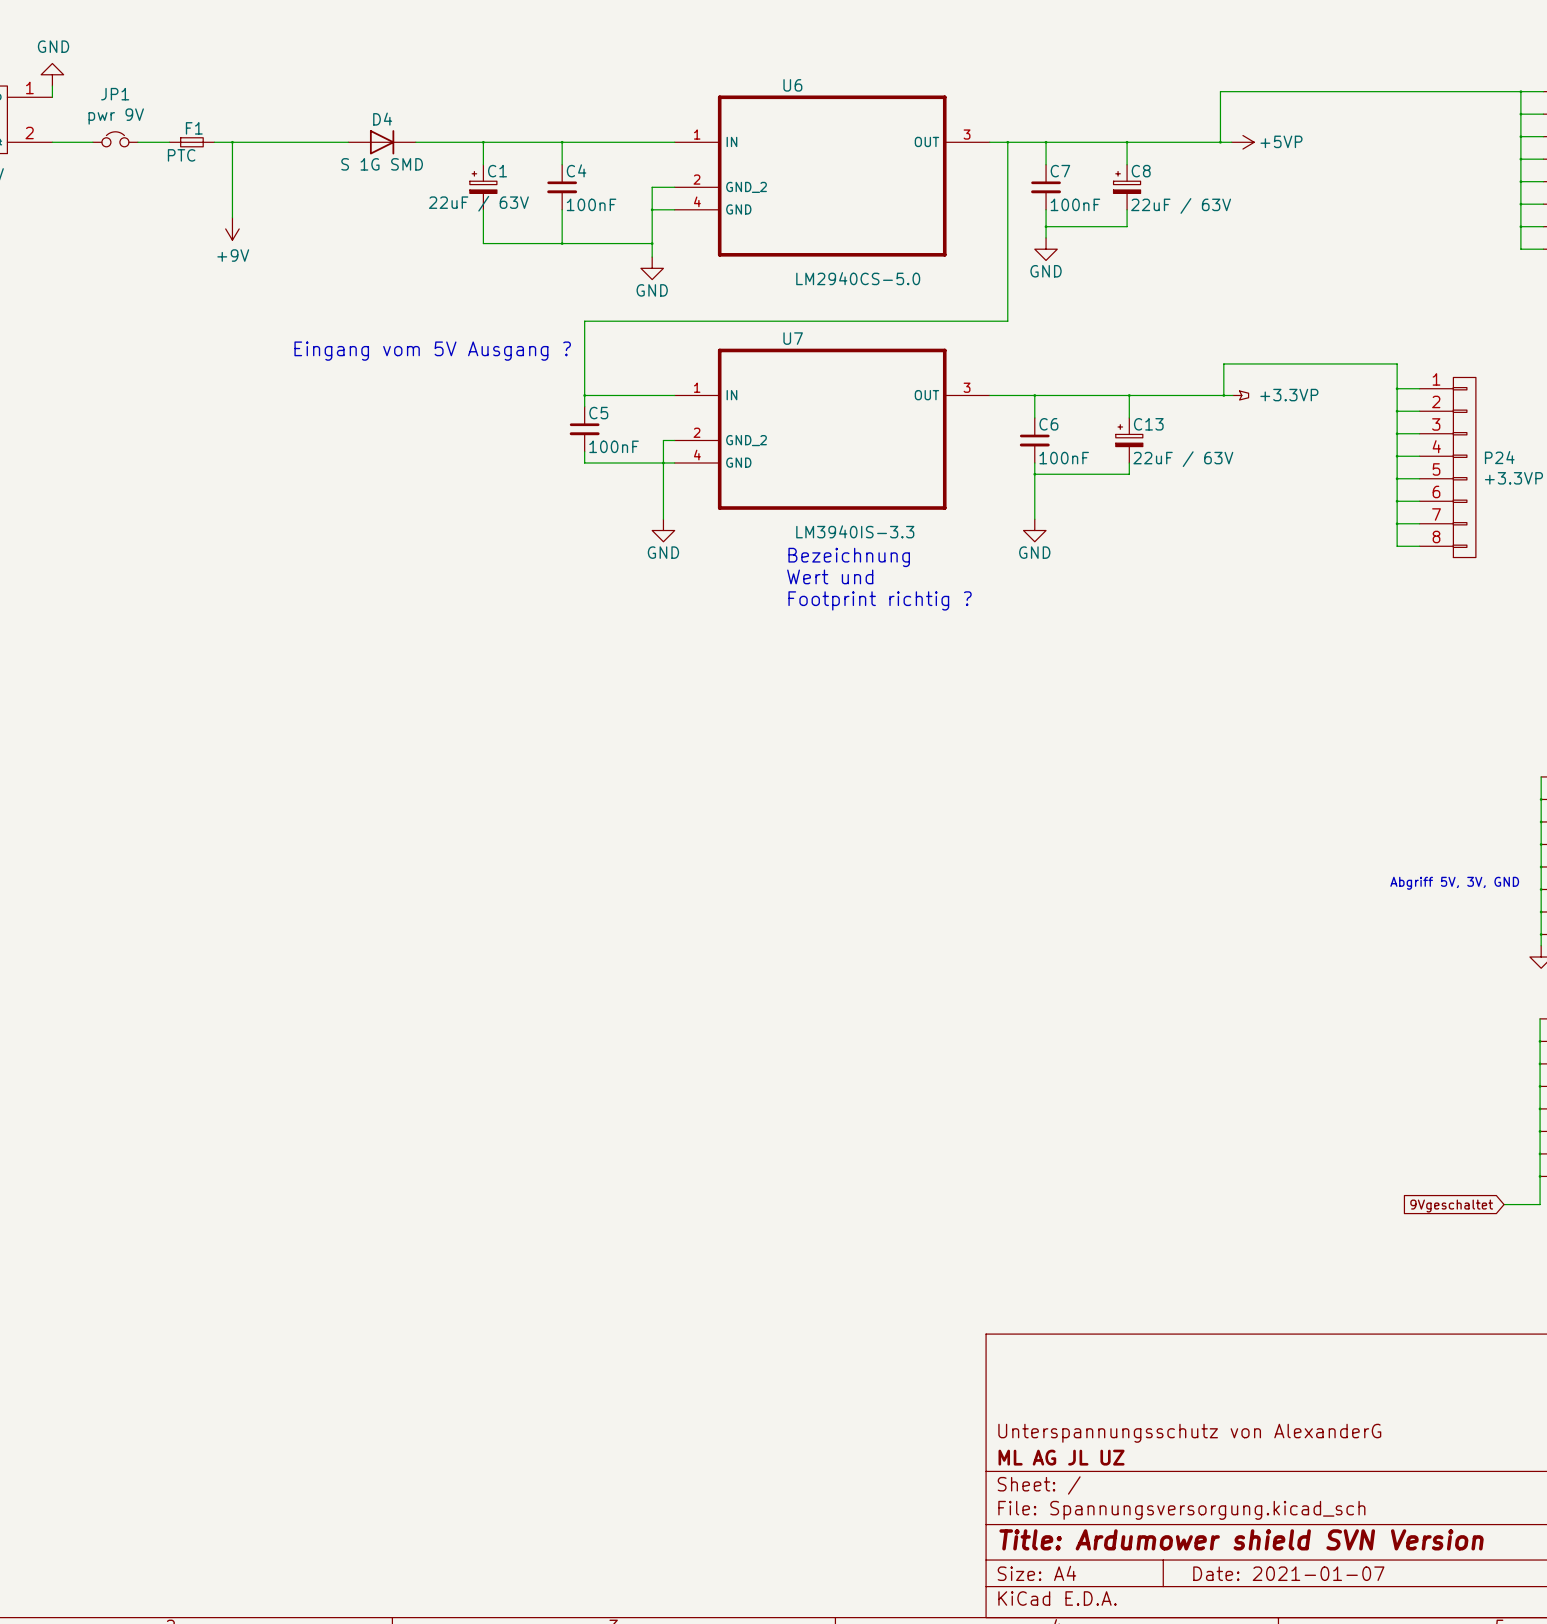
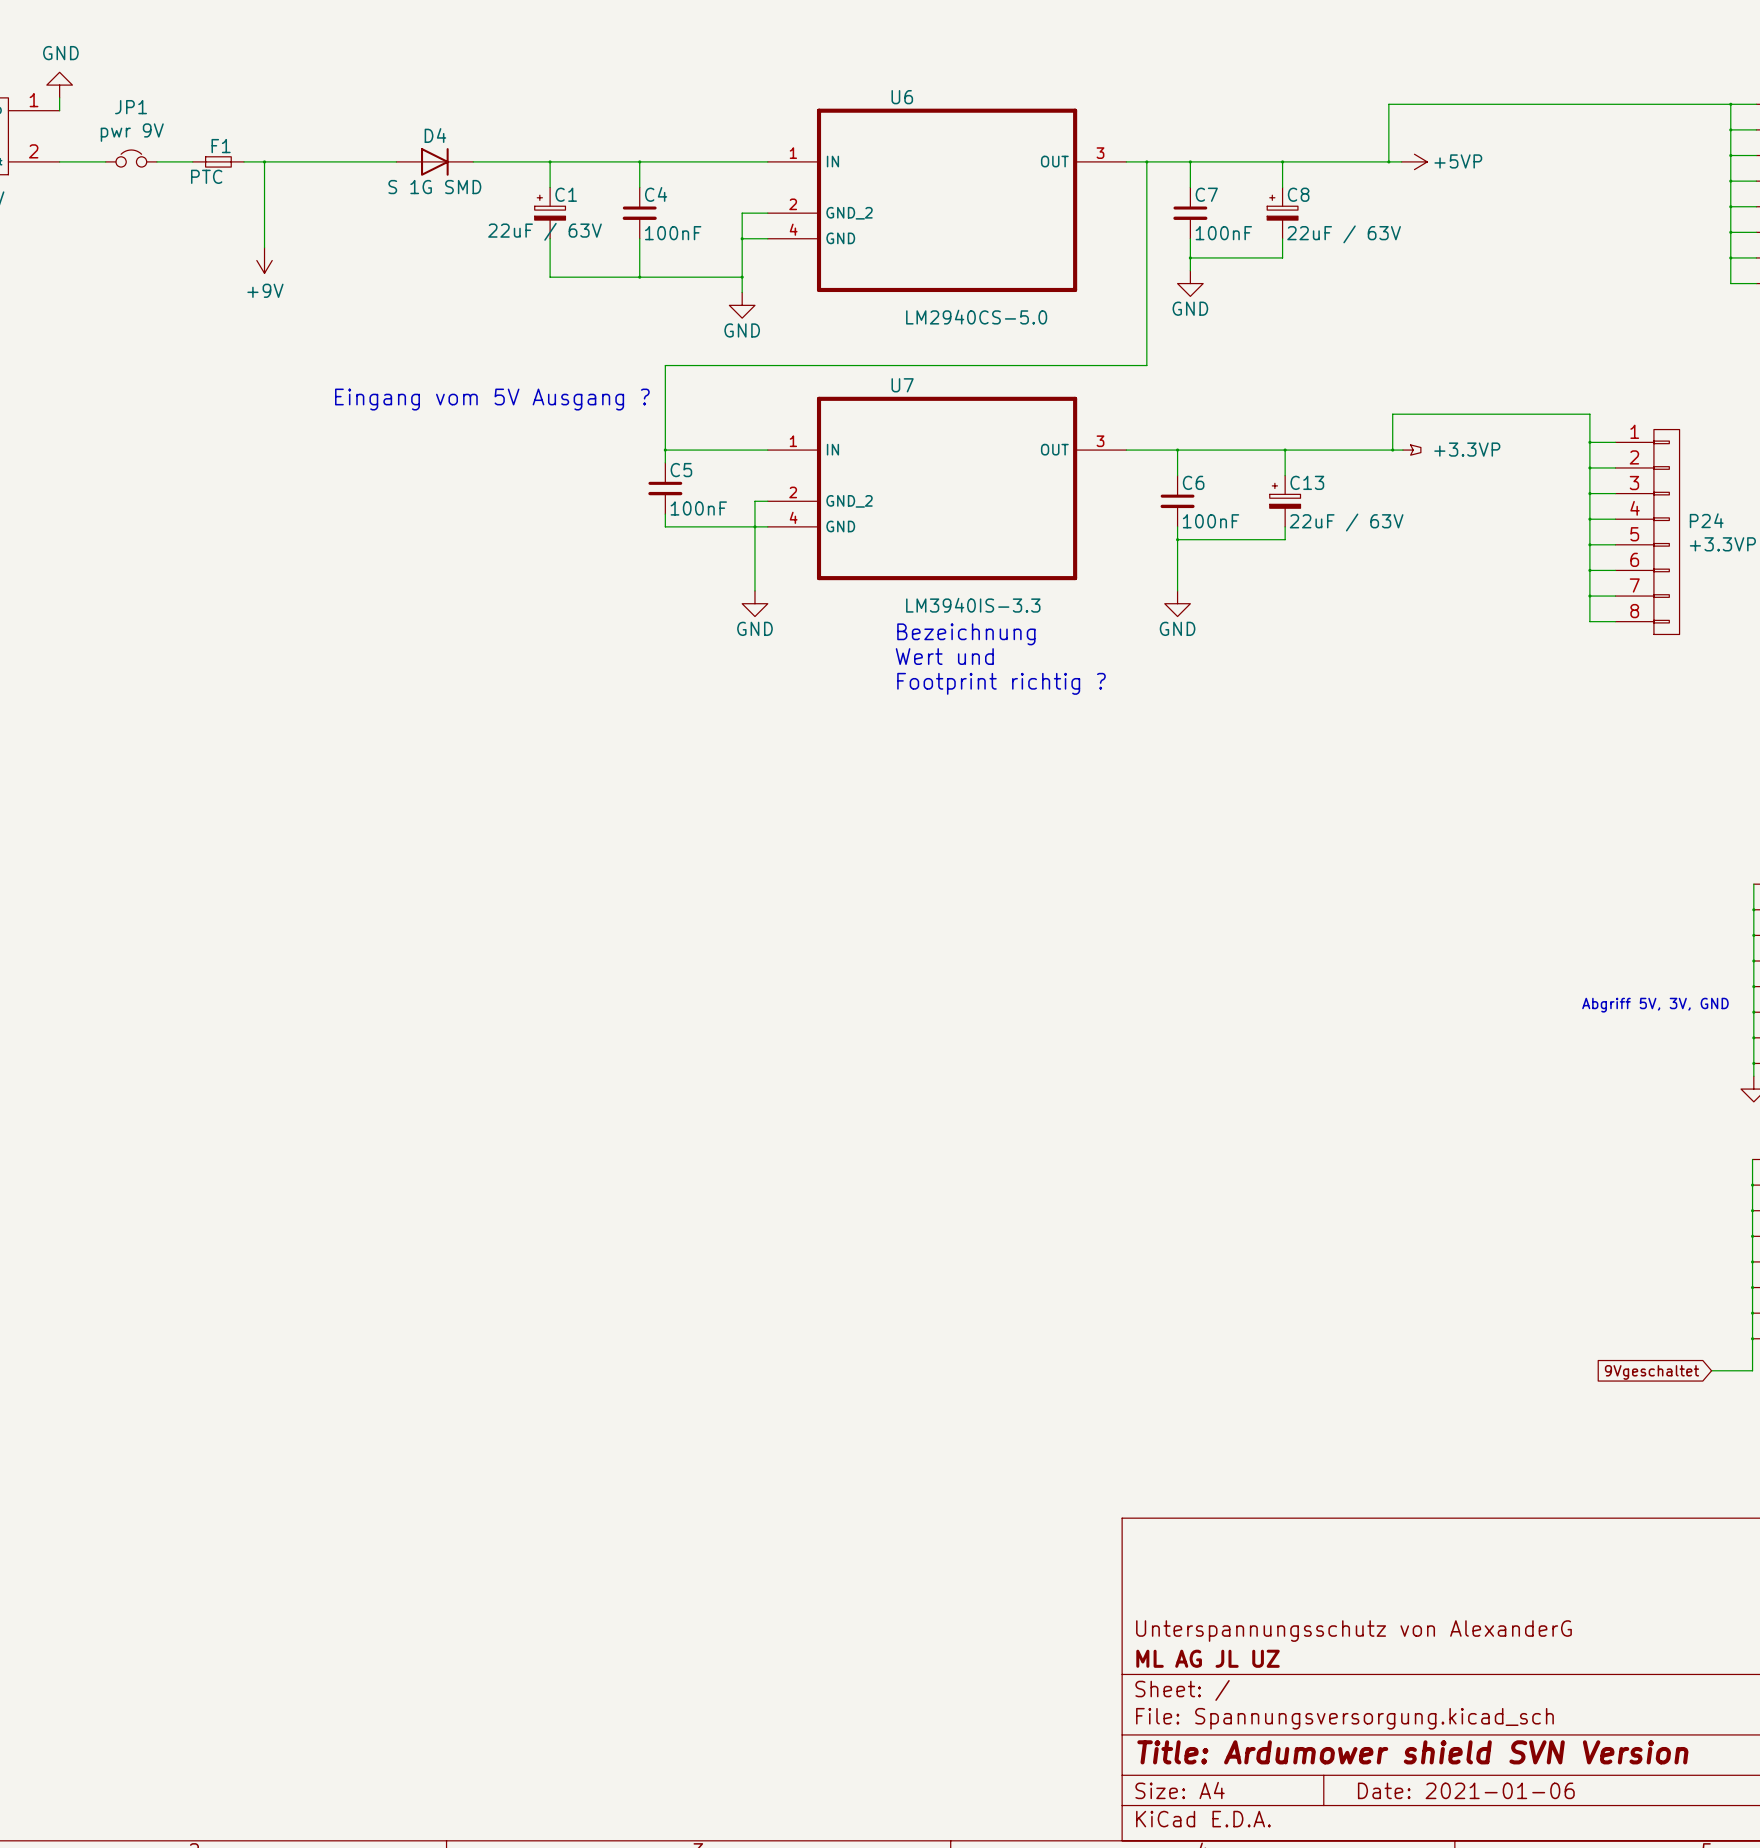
title block: Date: 2021-01-07 (1288, 1573) -> Date: 2021-01-06 (1466, 1790)

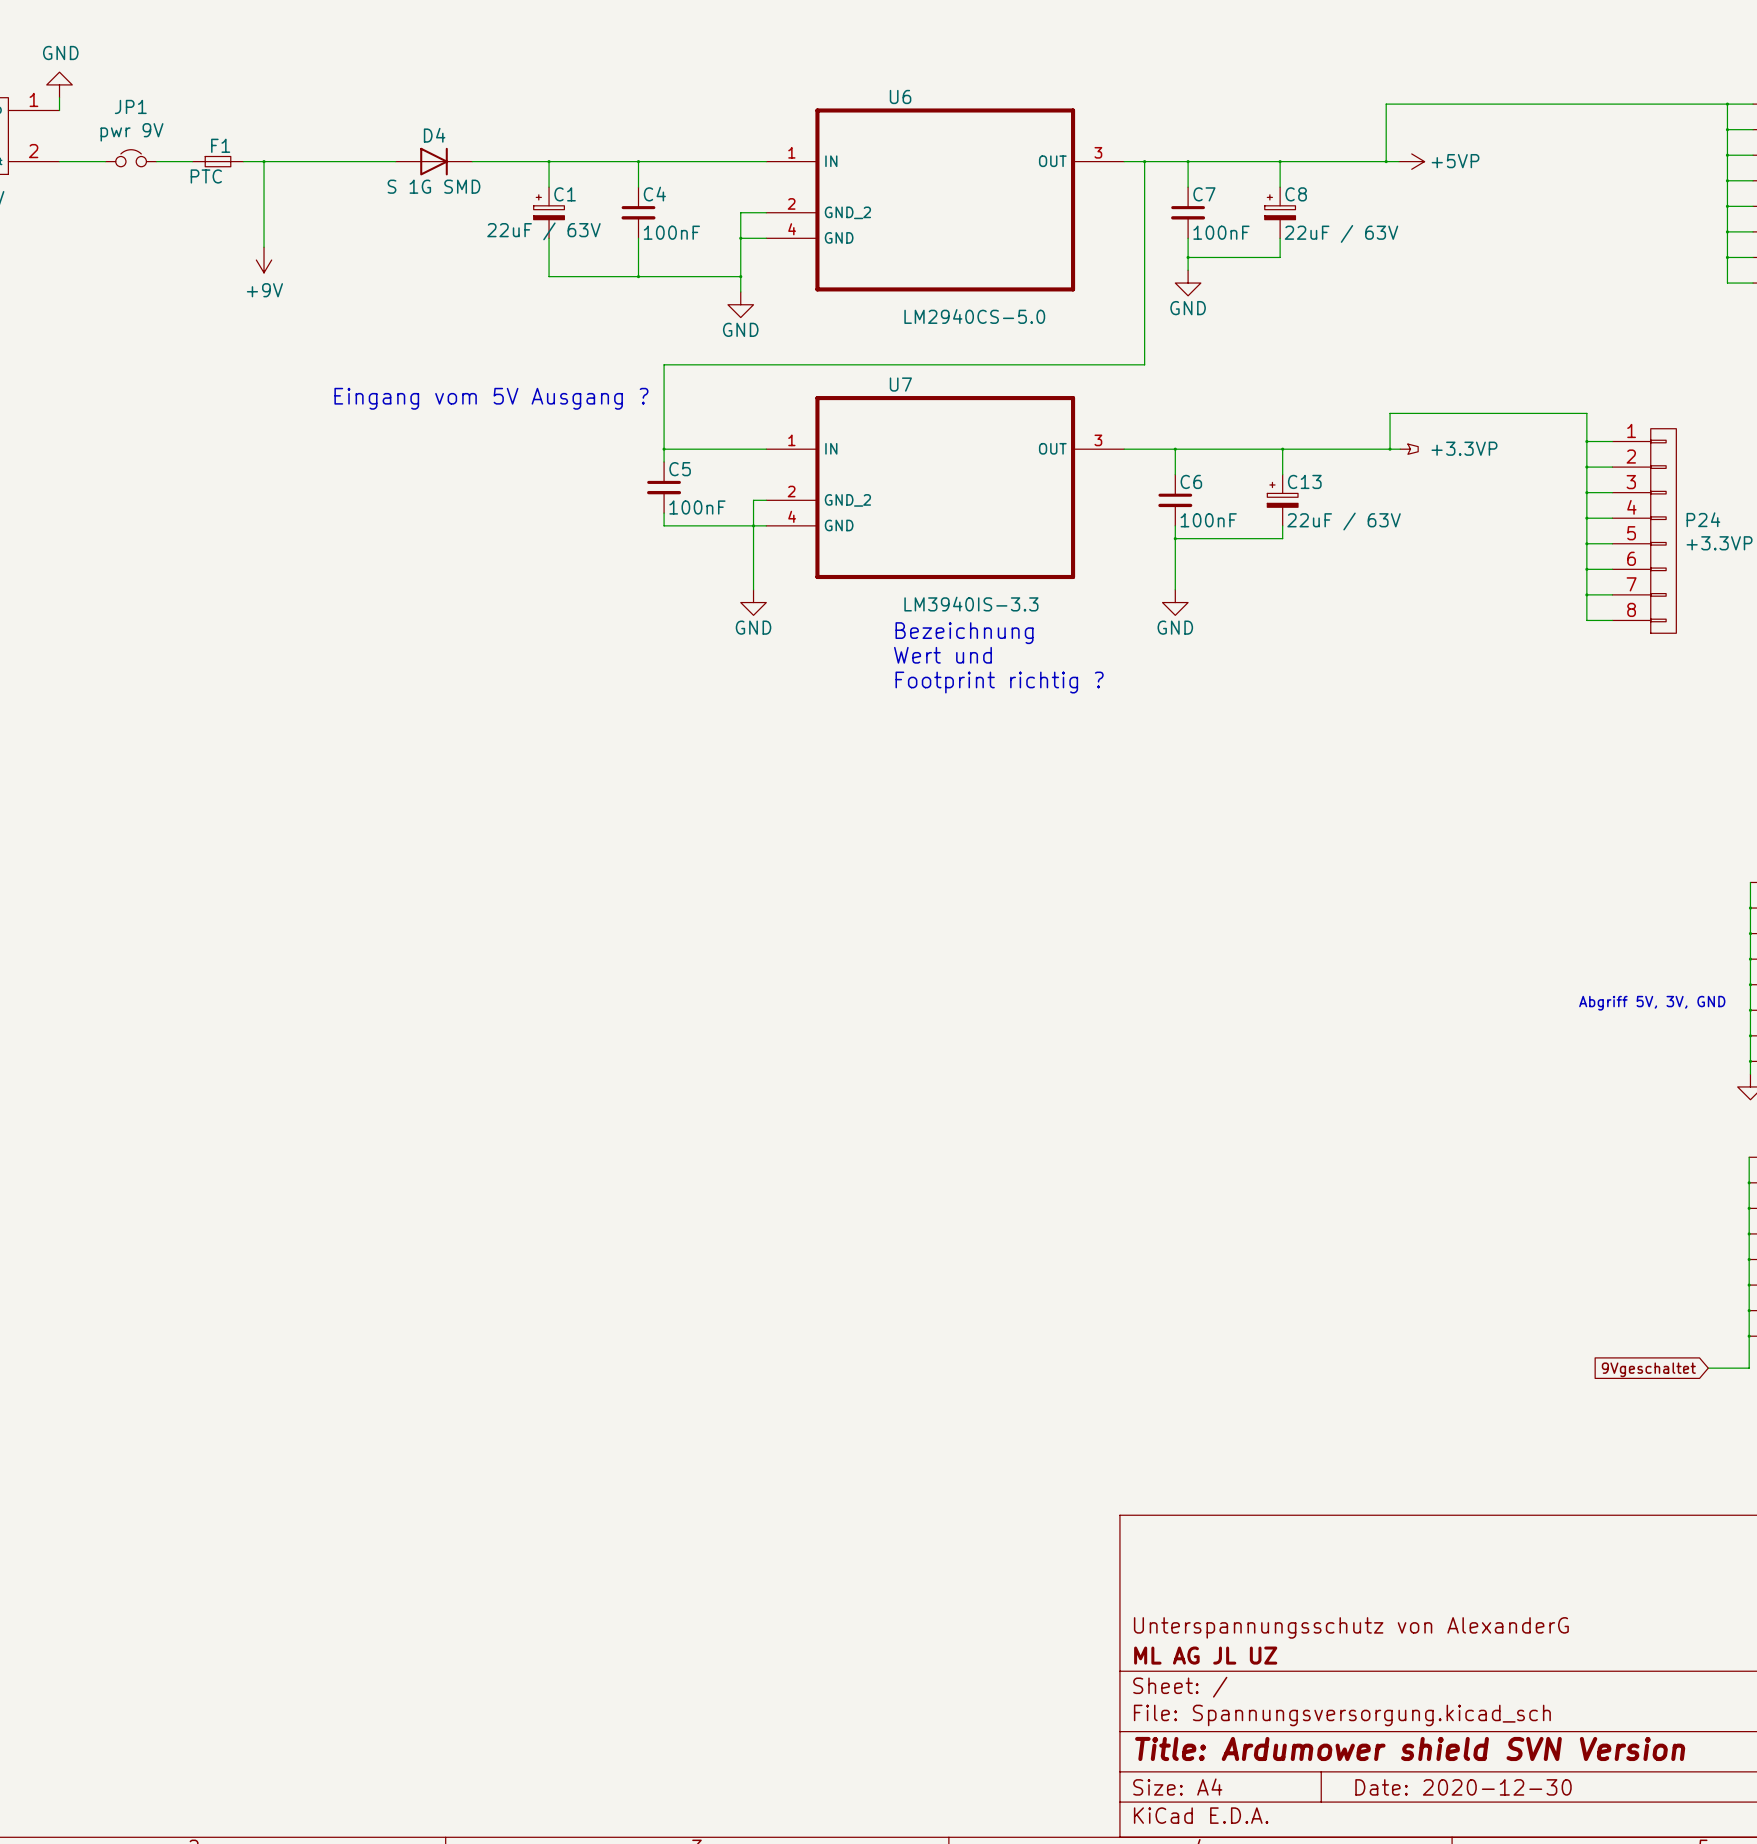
title block: Date: 2021-01-06 (1466, 1790) -> Date: 2020-12-30 (1463, 1787)

